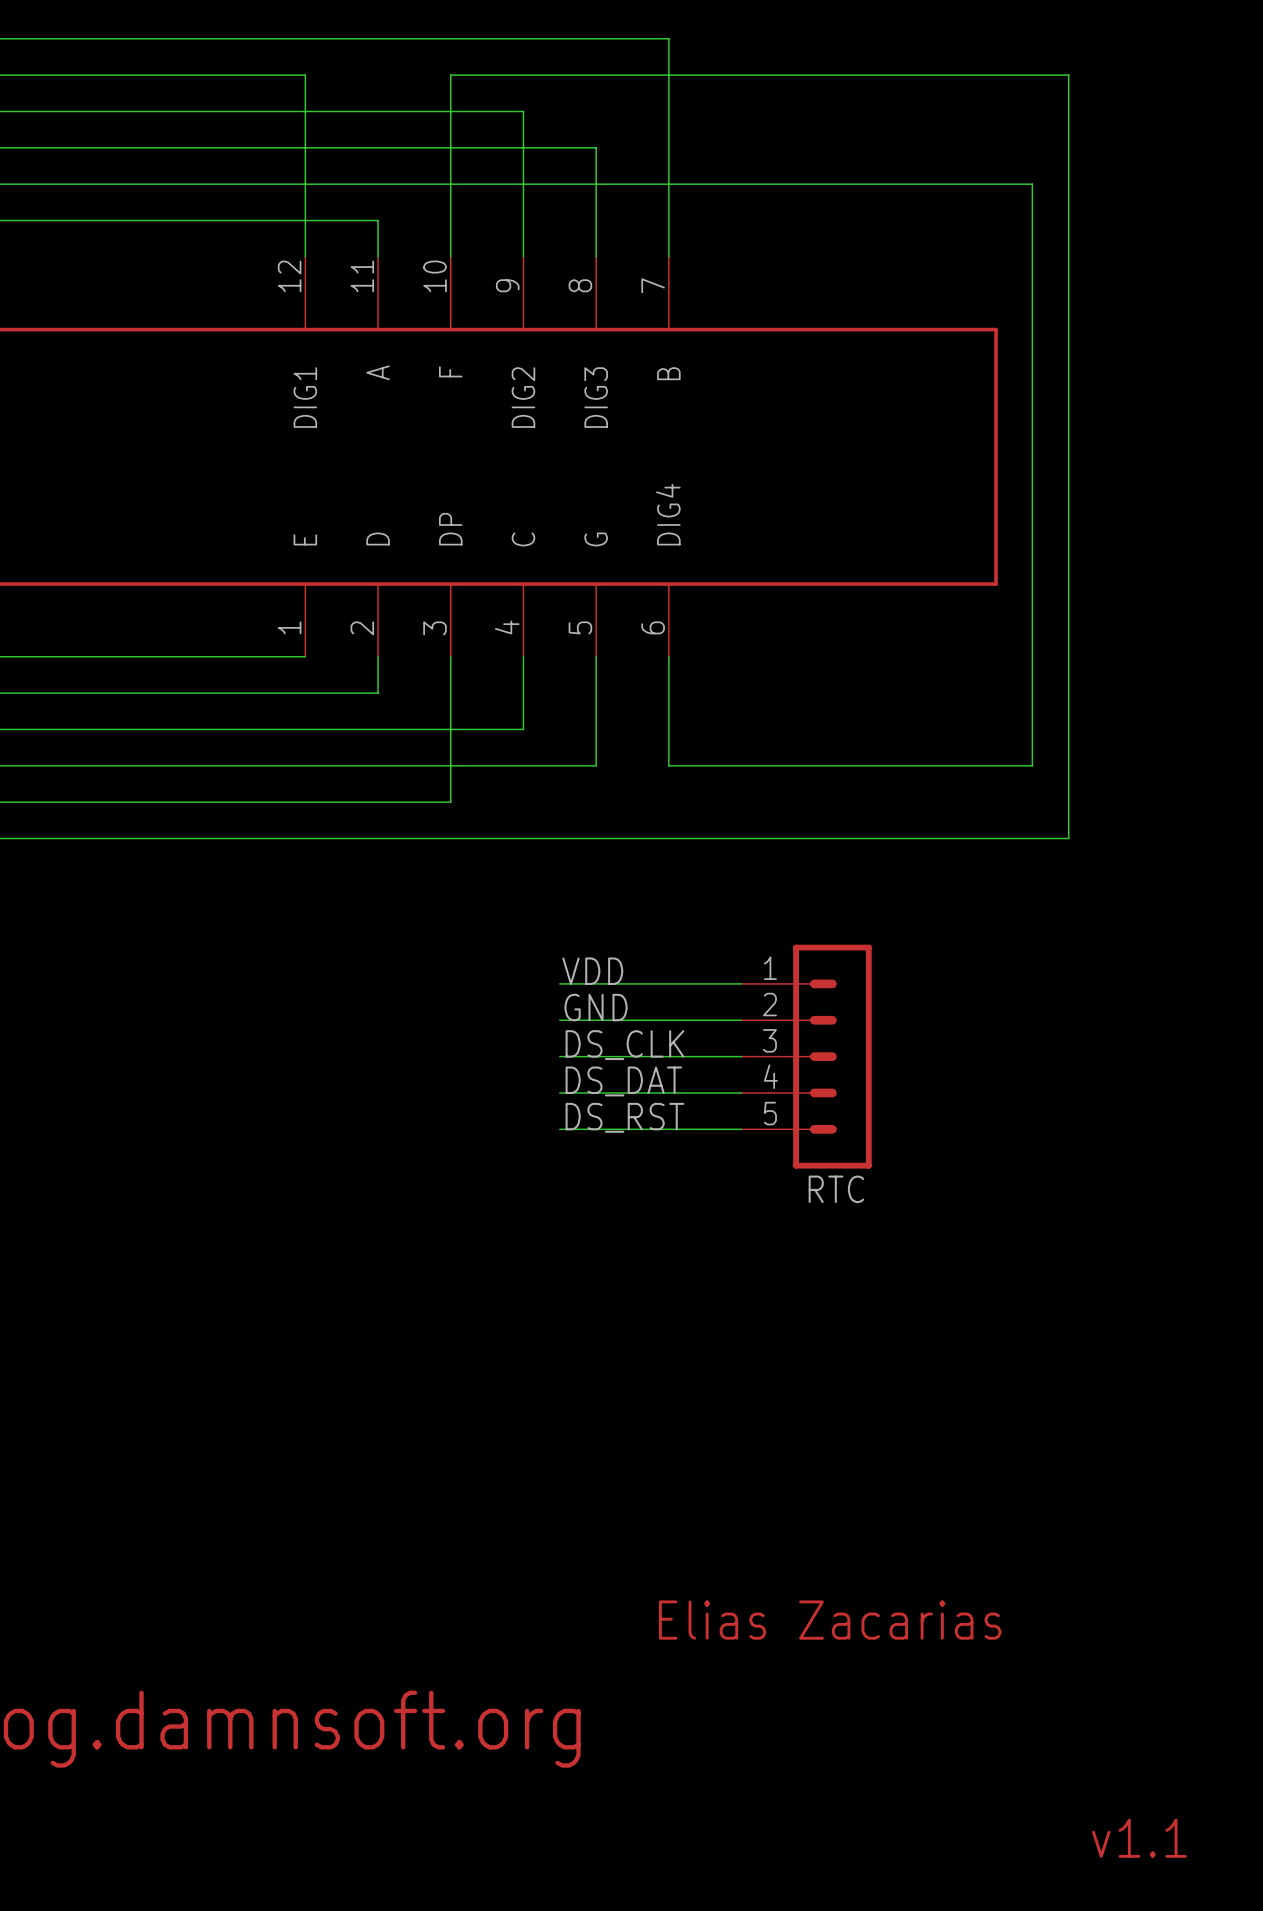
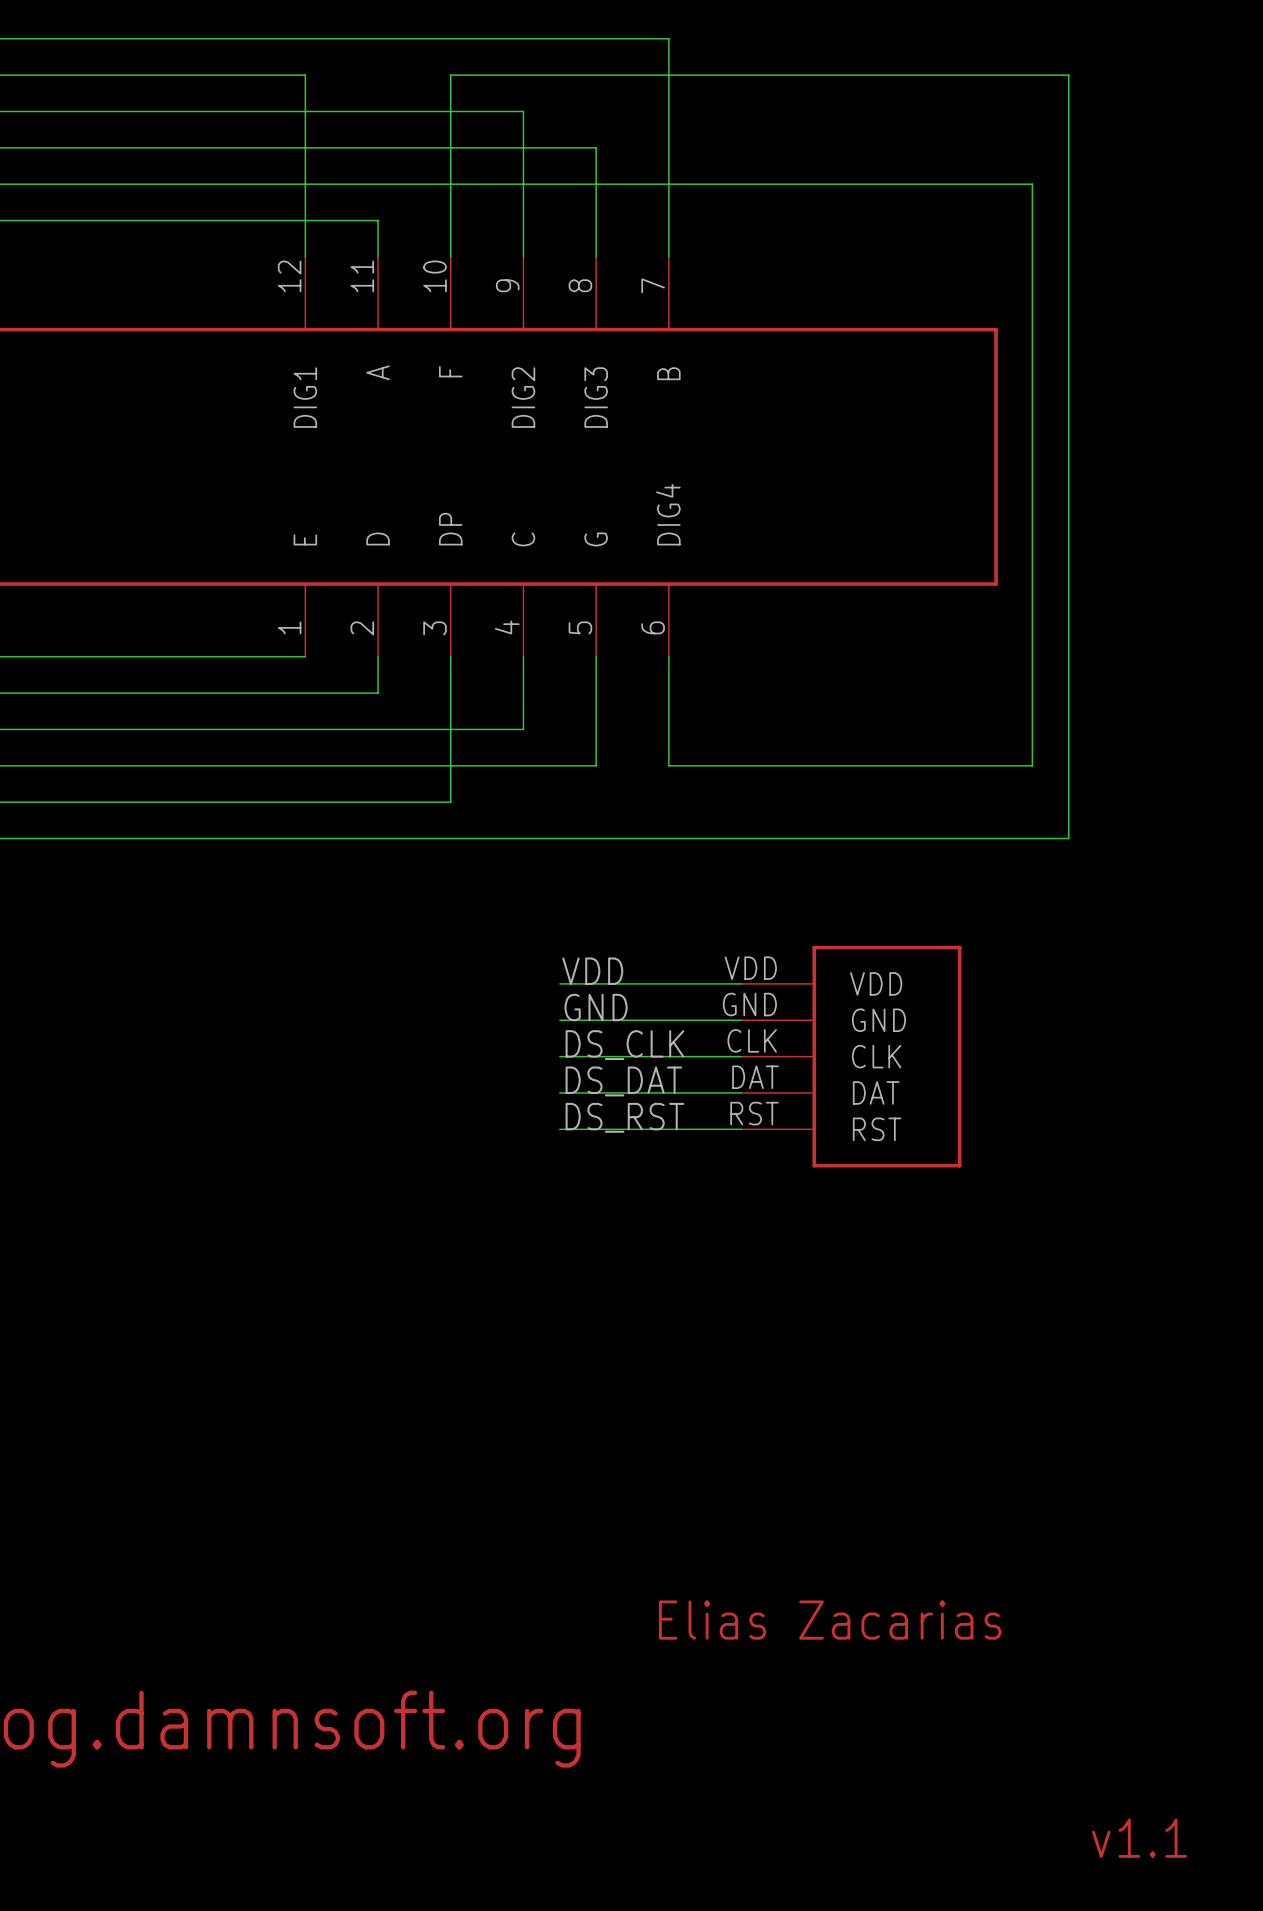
RTC: (806, 1056) -> none
part: none -> (851, 1056)

